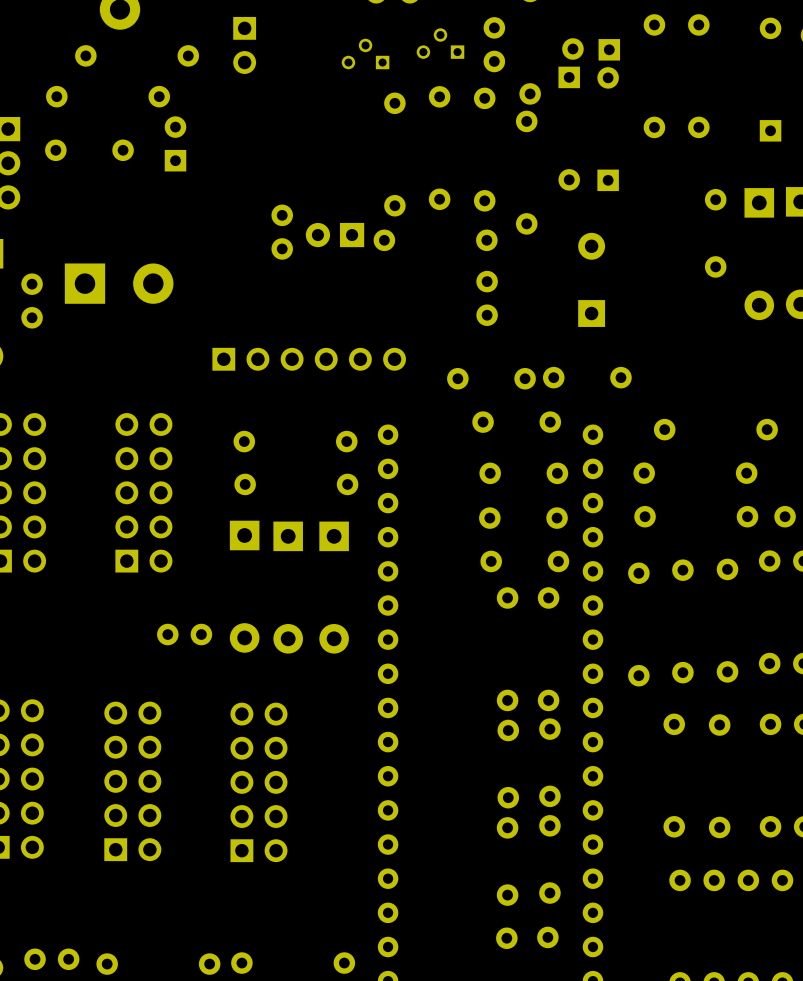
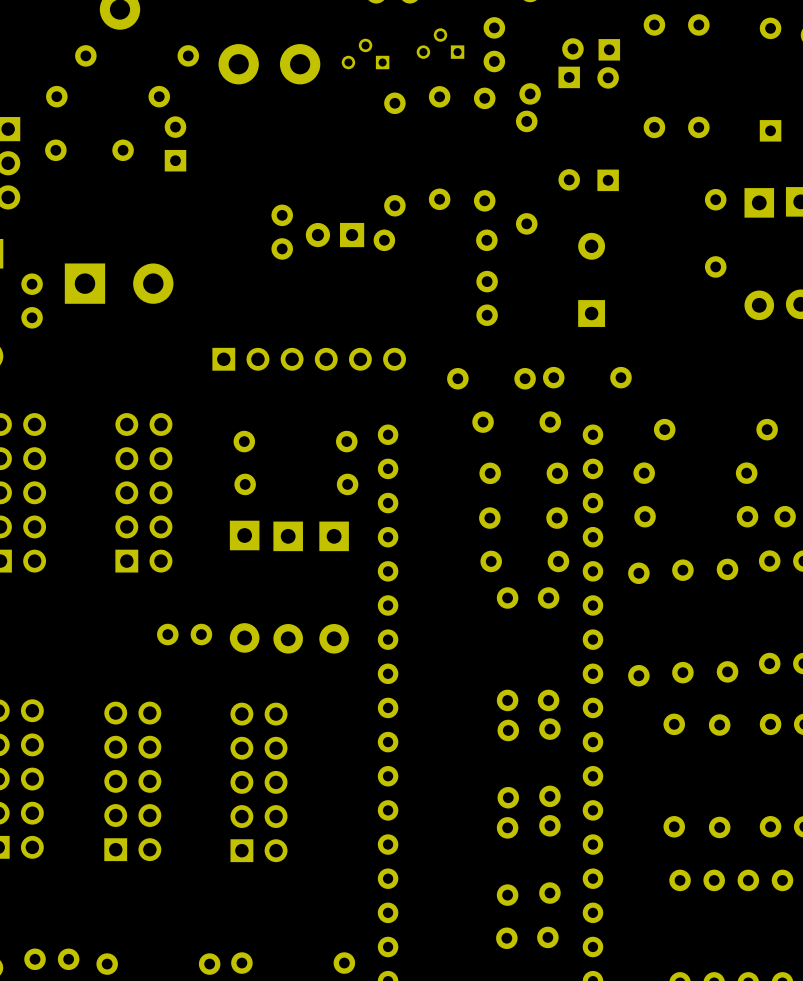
part: (244, 45) -> none
part: none -> (269, 64)

